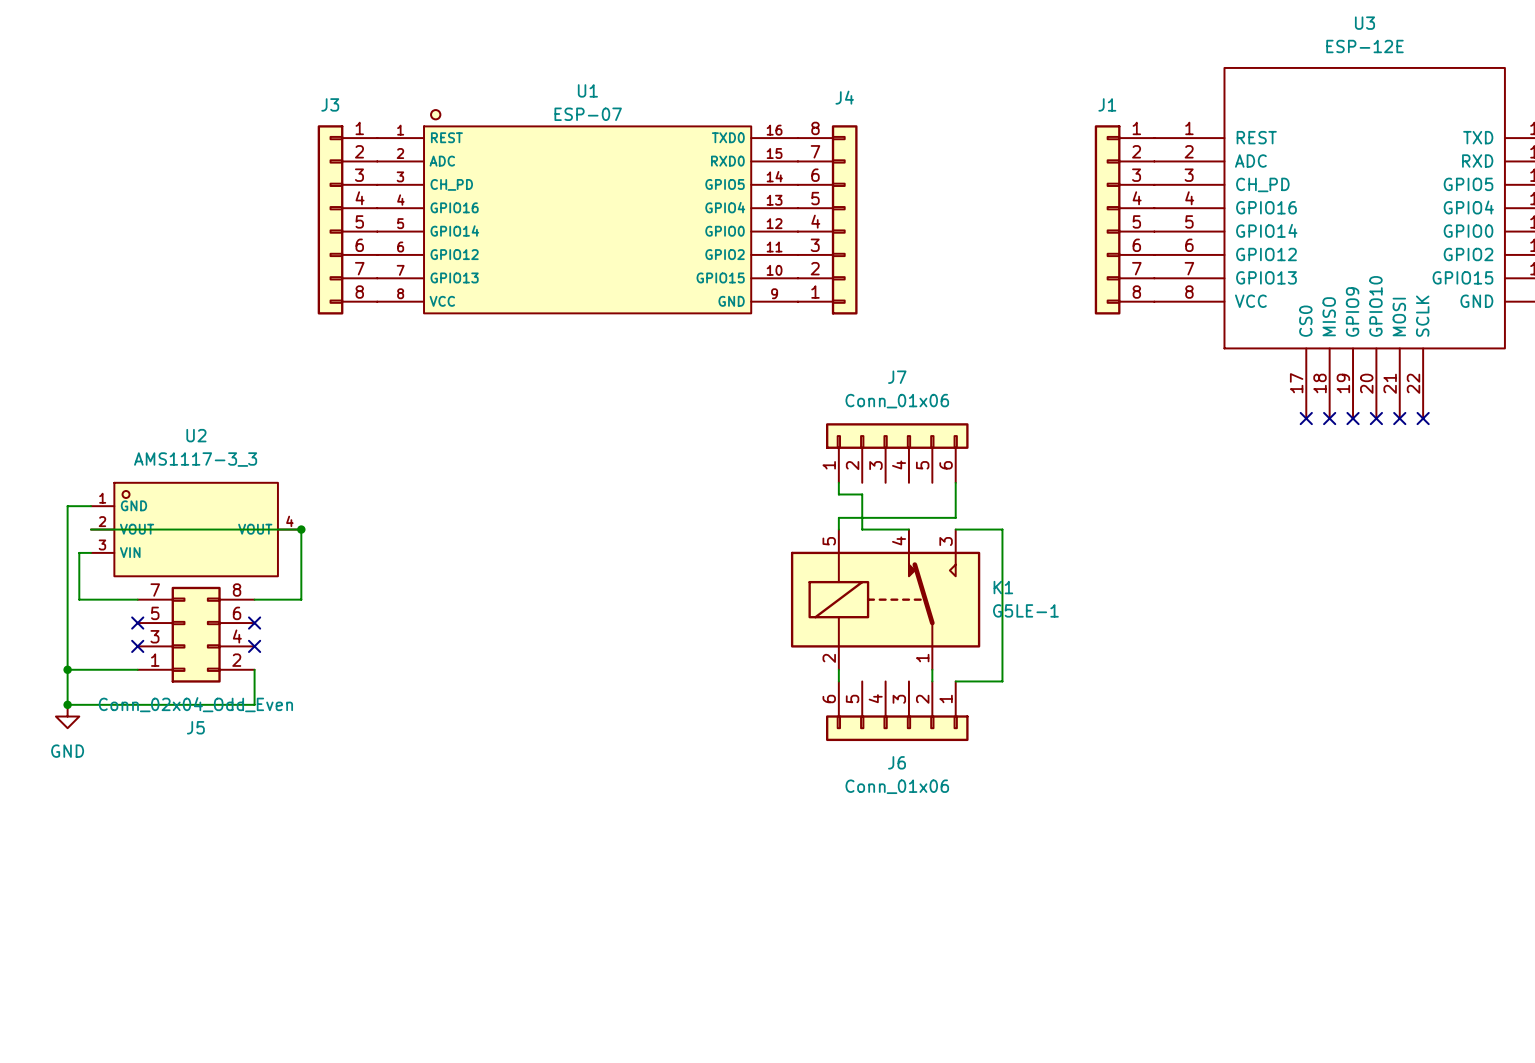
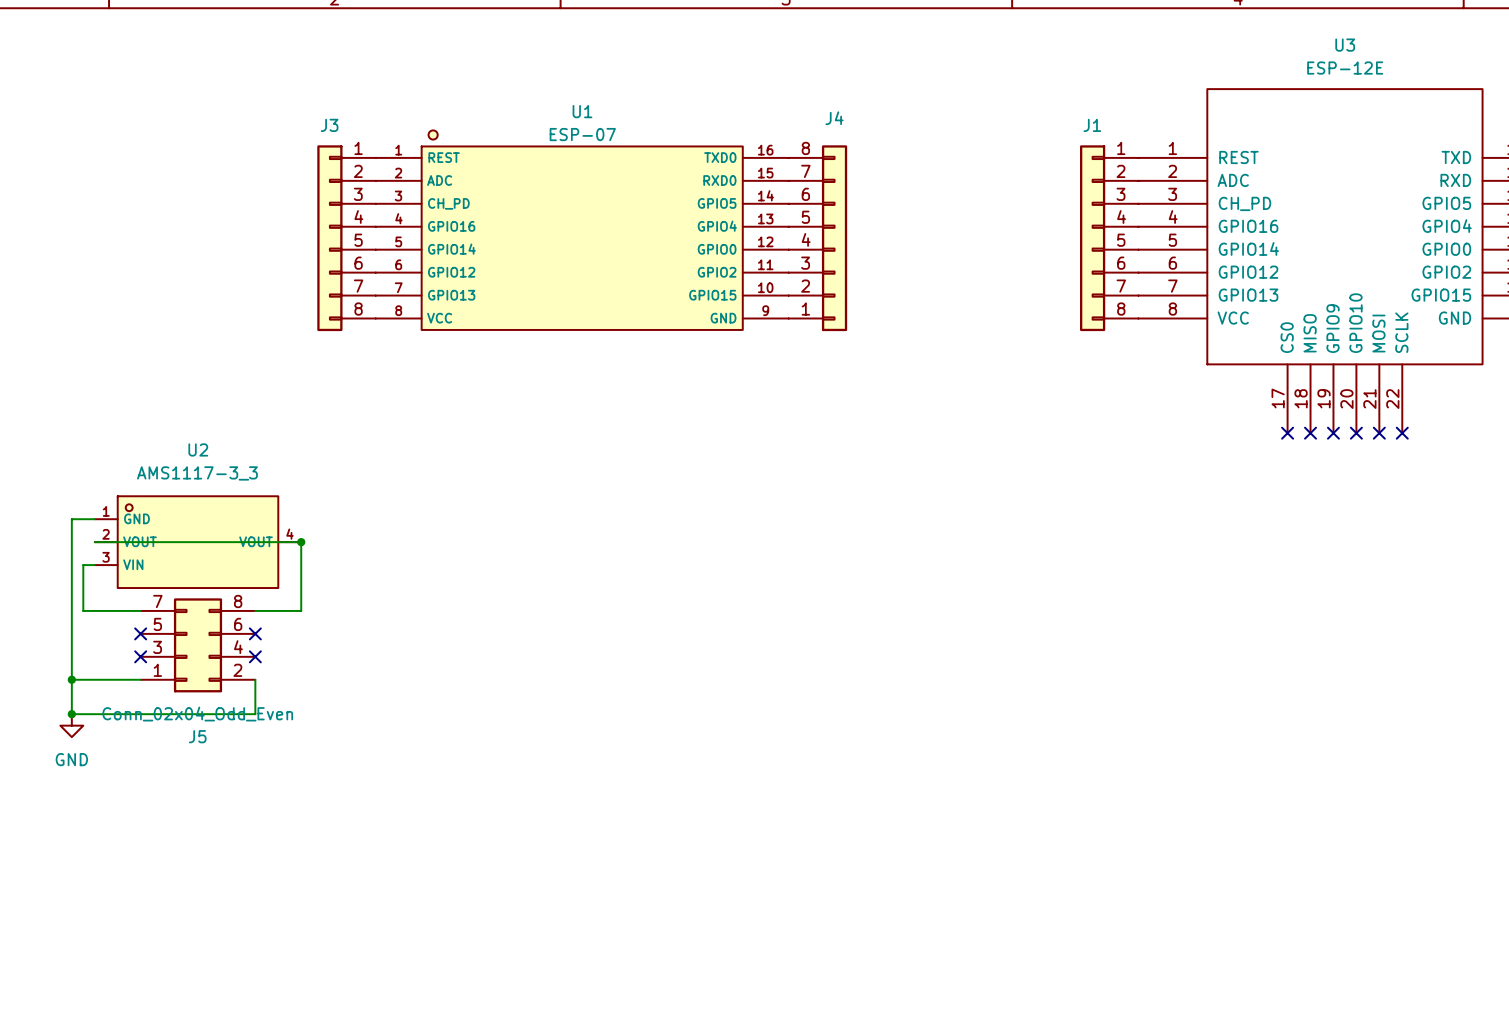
J7: Conn_01x06 (897, 453) -> none
wire: (838, 482) (838, 494) (862, 494) (862, 529) (908, 529) -> none
wire: (955, 482) (955, 517) (838, 517) (838, 529) -> none
wire: (955, 529) (1002, 529) (1002, 681) (955, 681) -> none
K1: G5LE-1 (885, 599) -> none
wire: (838, 669) (838, 681) -> none
wire: (932, 669) (932, 681) -> none
J6: Conn_01x06 (897, 711) -> none

